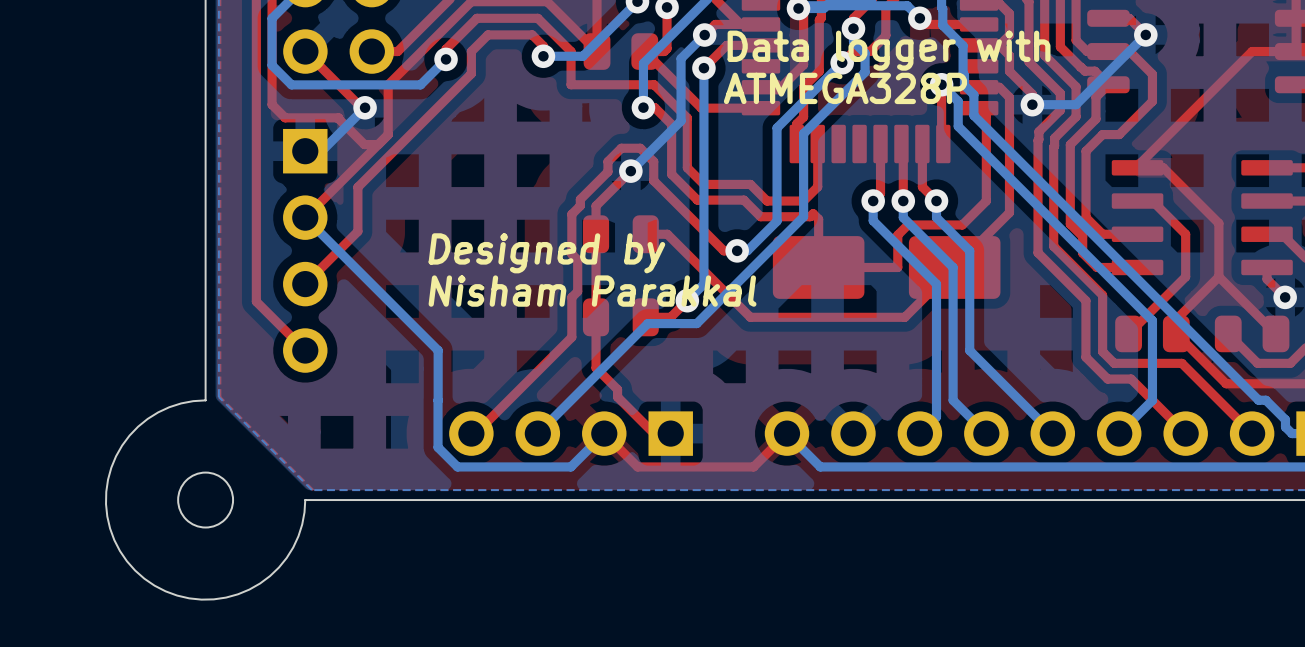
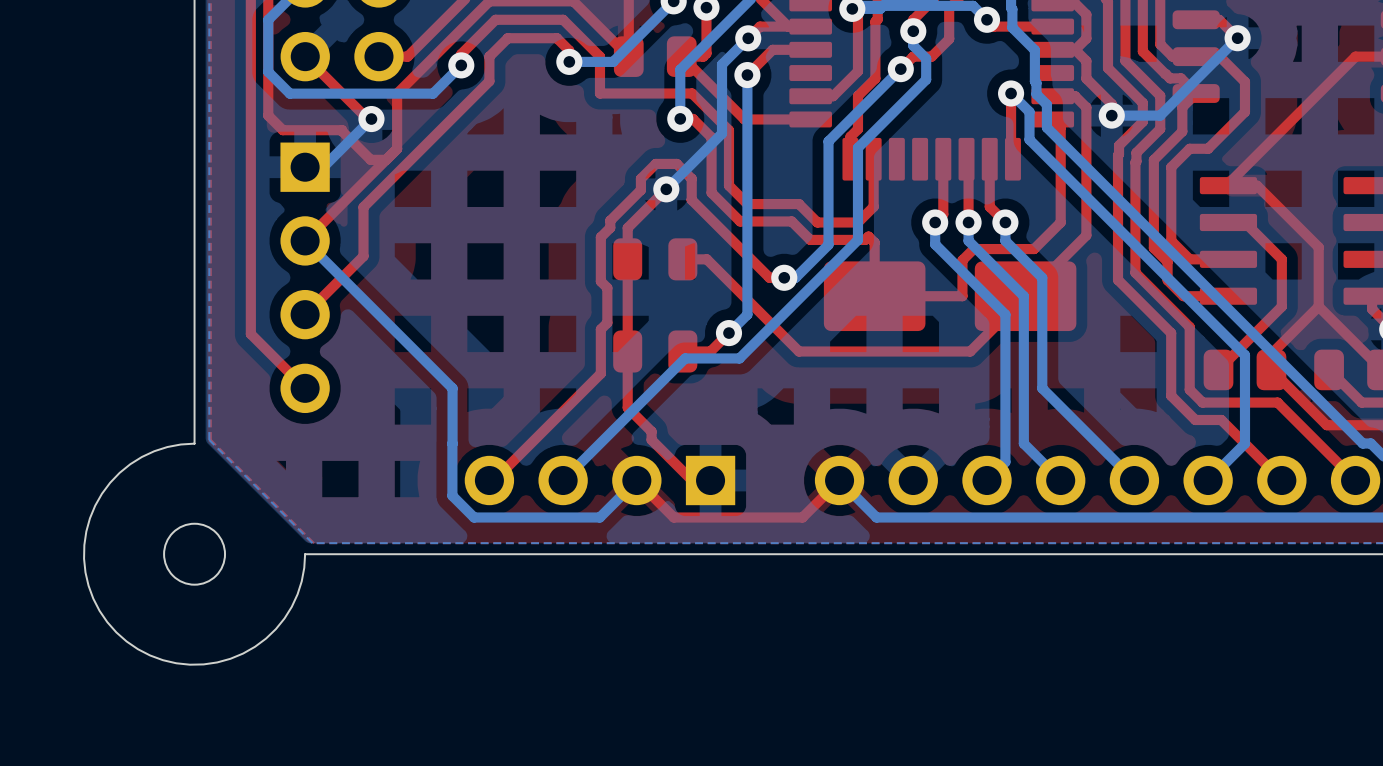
text: Data logger with (889, 50) -> none
text: ATMEGA328P (845, 88) -> none
text: Designed by (546, 253) -> none
text: Nisham Parakkal (592, 291) -> none

